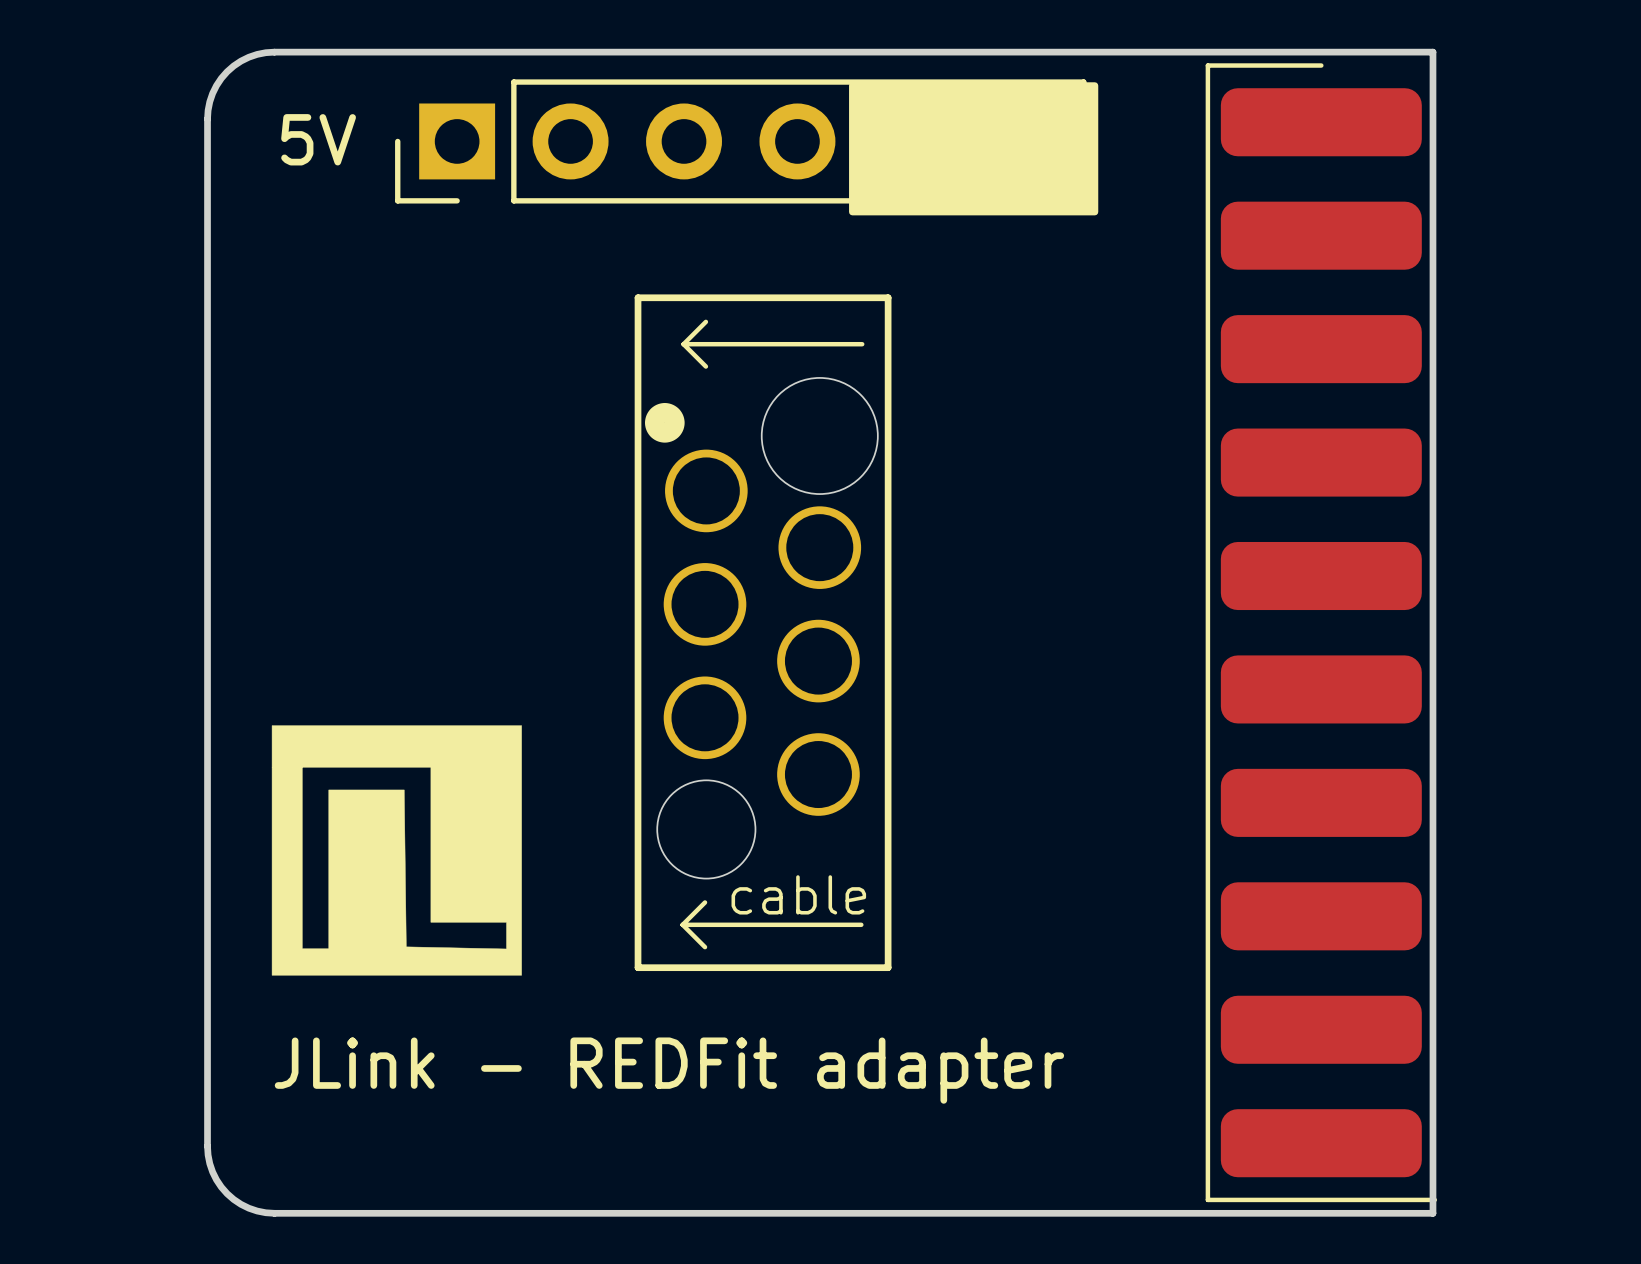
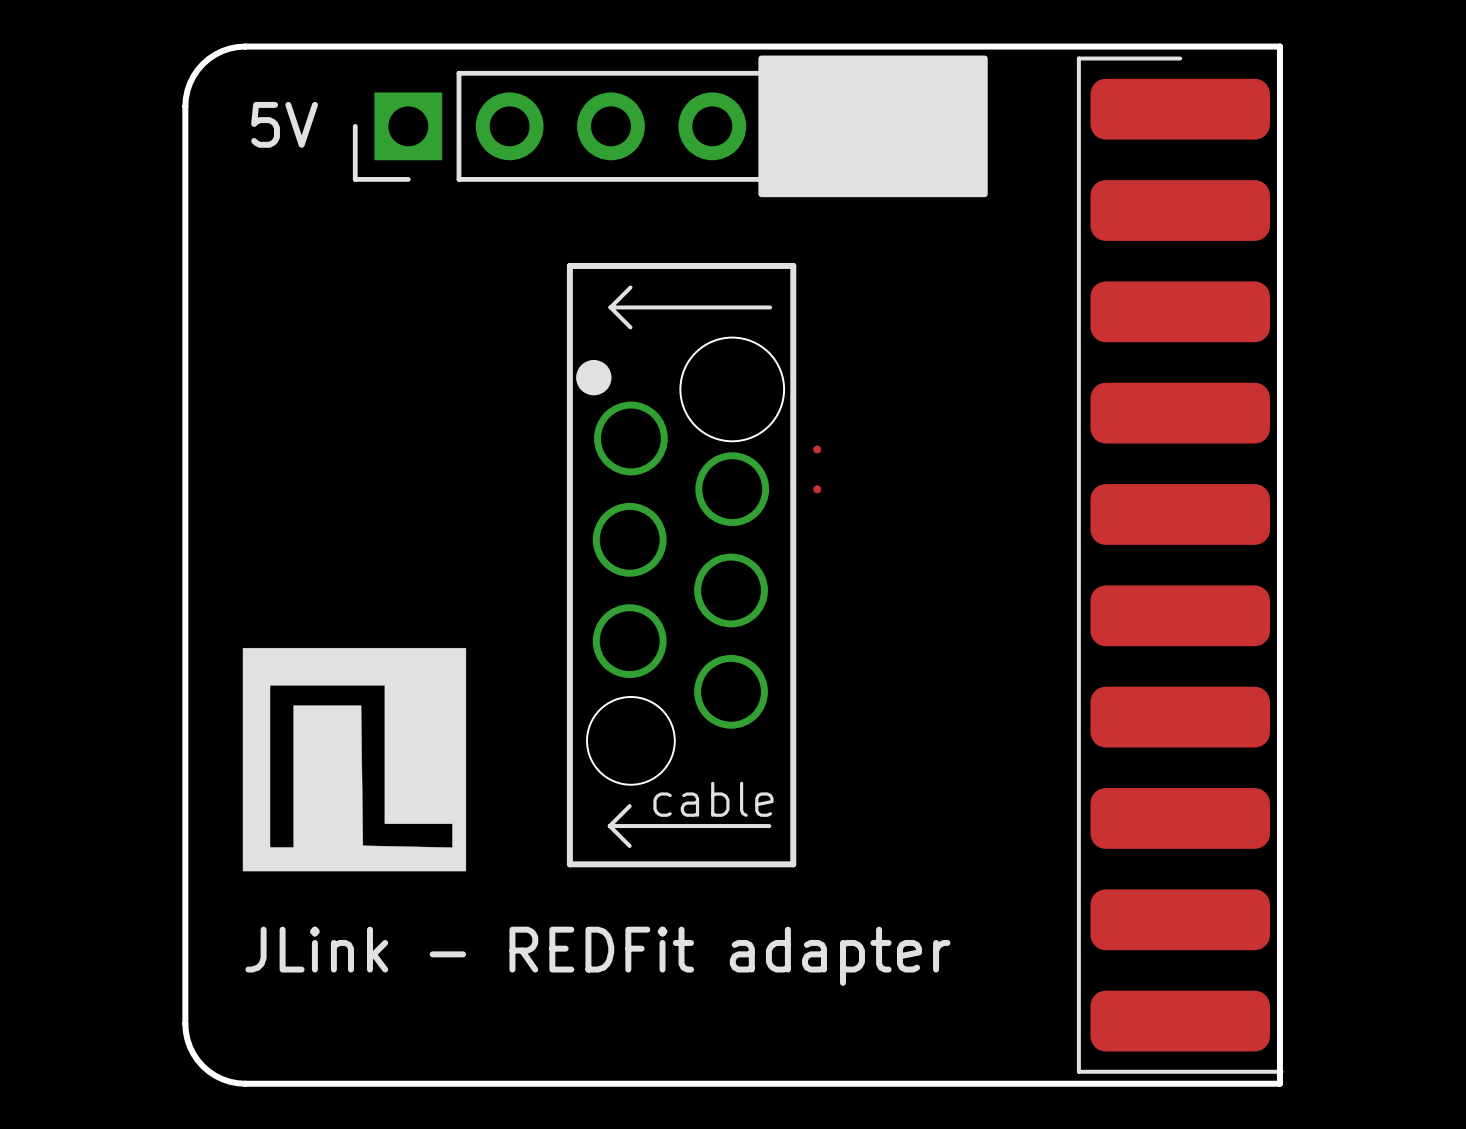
drawing shape: [849, 82, 1099, 216] -> [758, 55, 988, 198]
part: none -> (817, 469)

